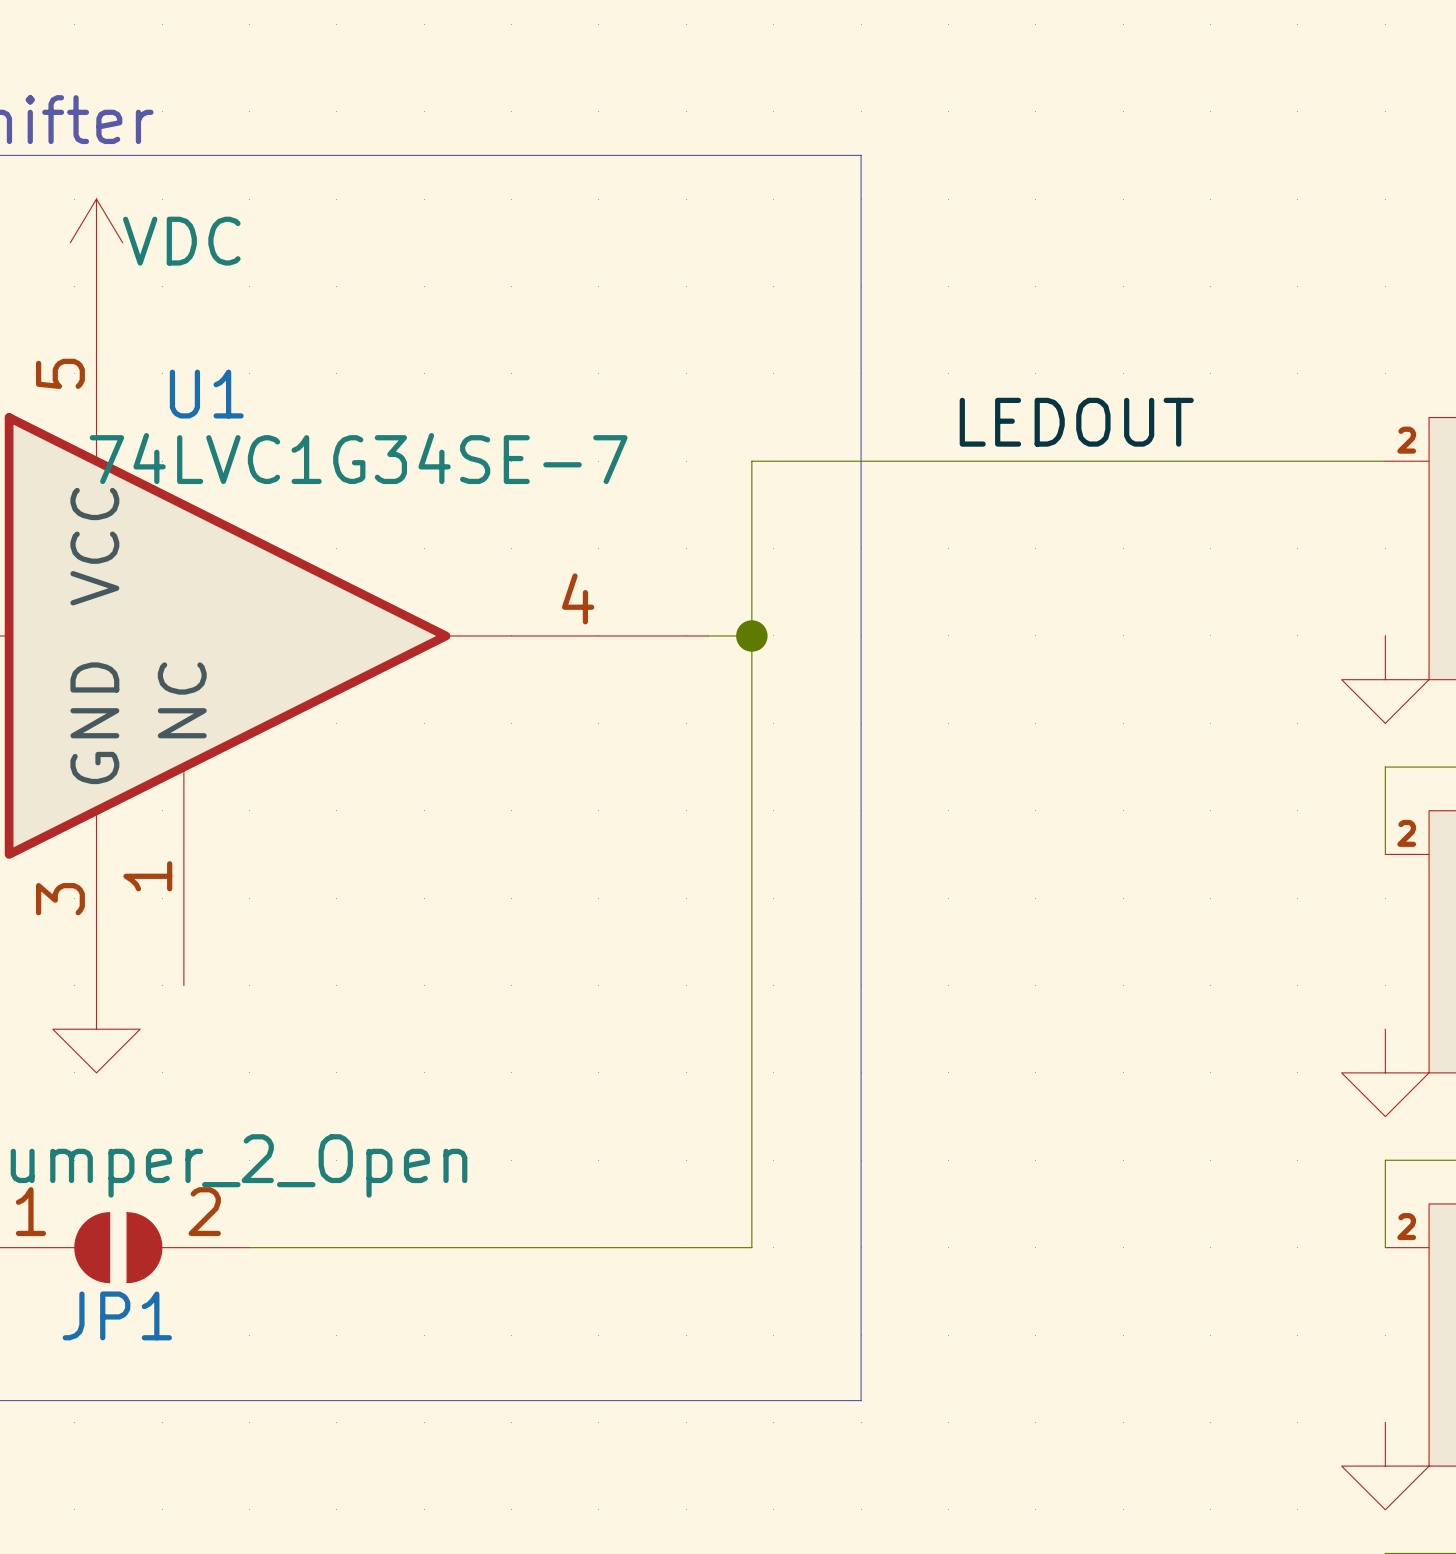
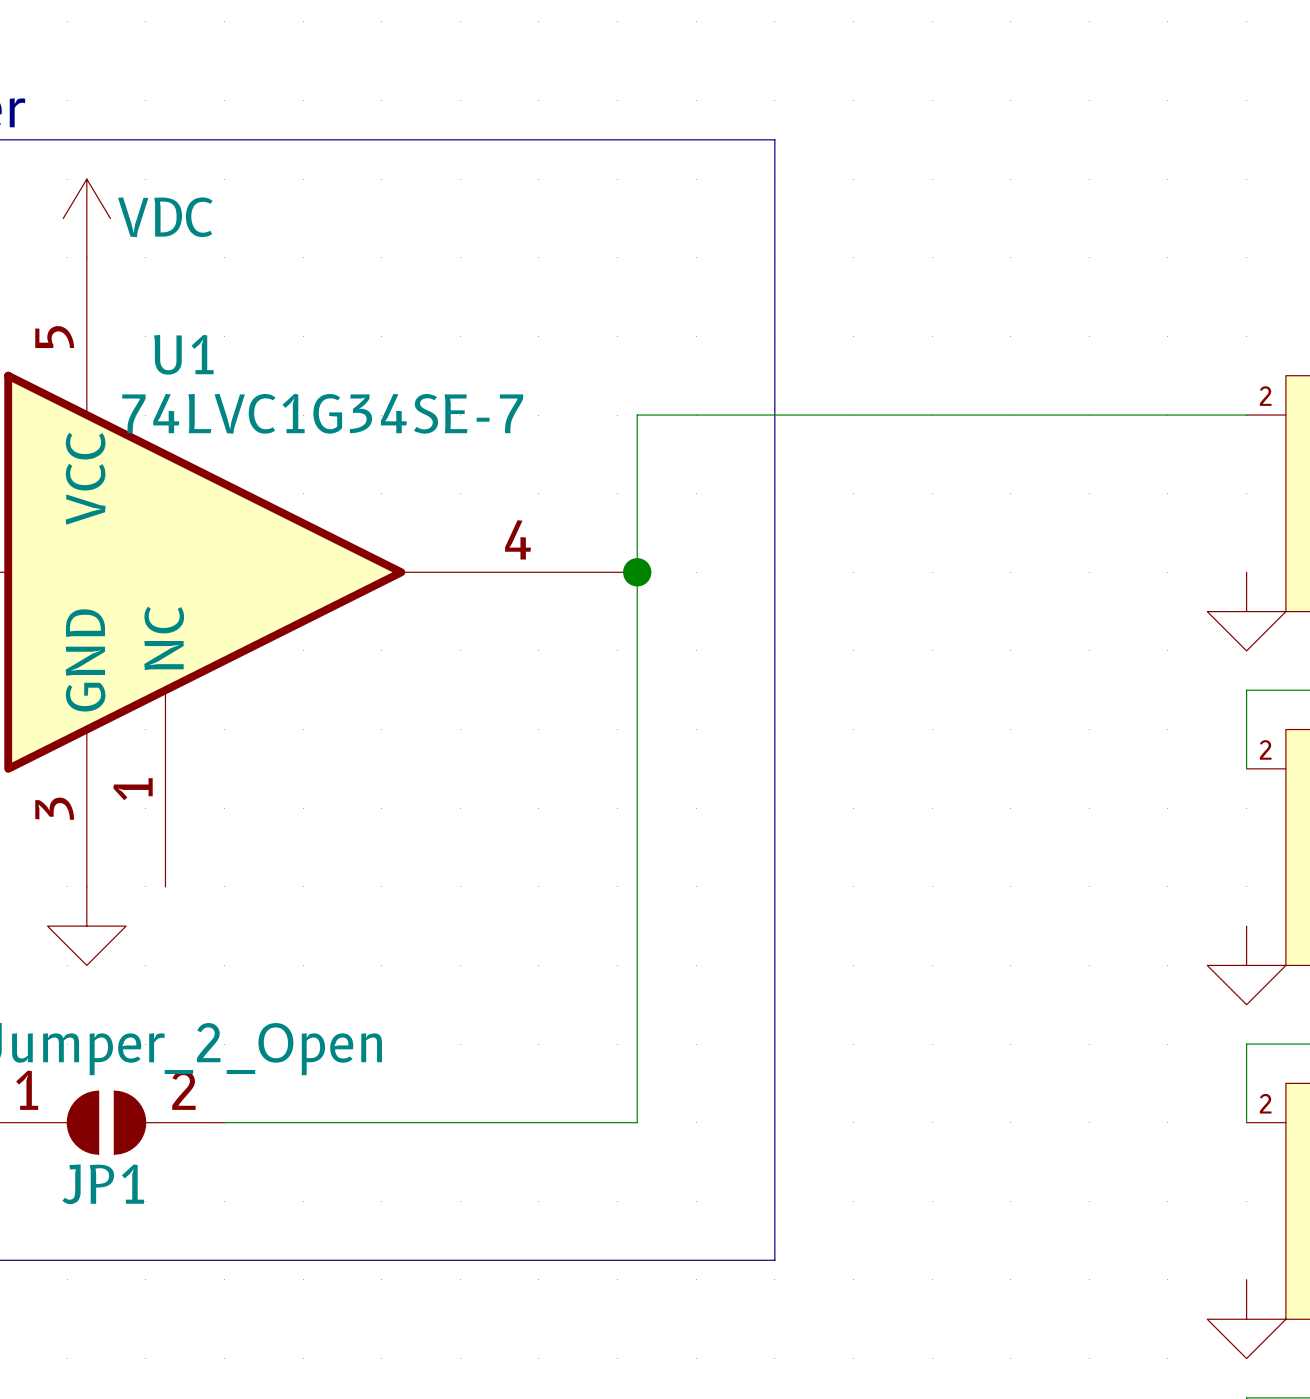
label: LEDOUT (1076, 422) -> none
wire: (751, 461) (751, 1247) (708, 1247) -> (676, 415) (637, 415) (637, 1122)
wire: (708, 635) (751, 635) -> none
junction position: (751, 635) -> (637, 572)

